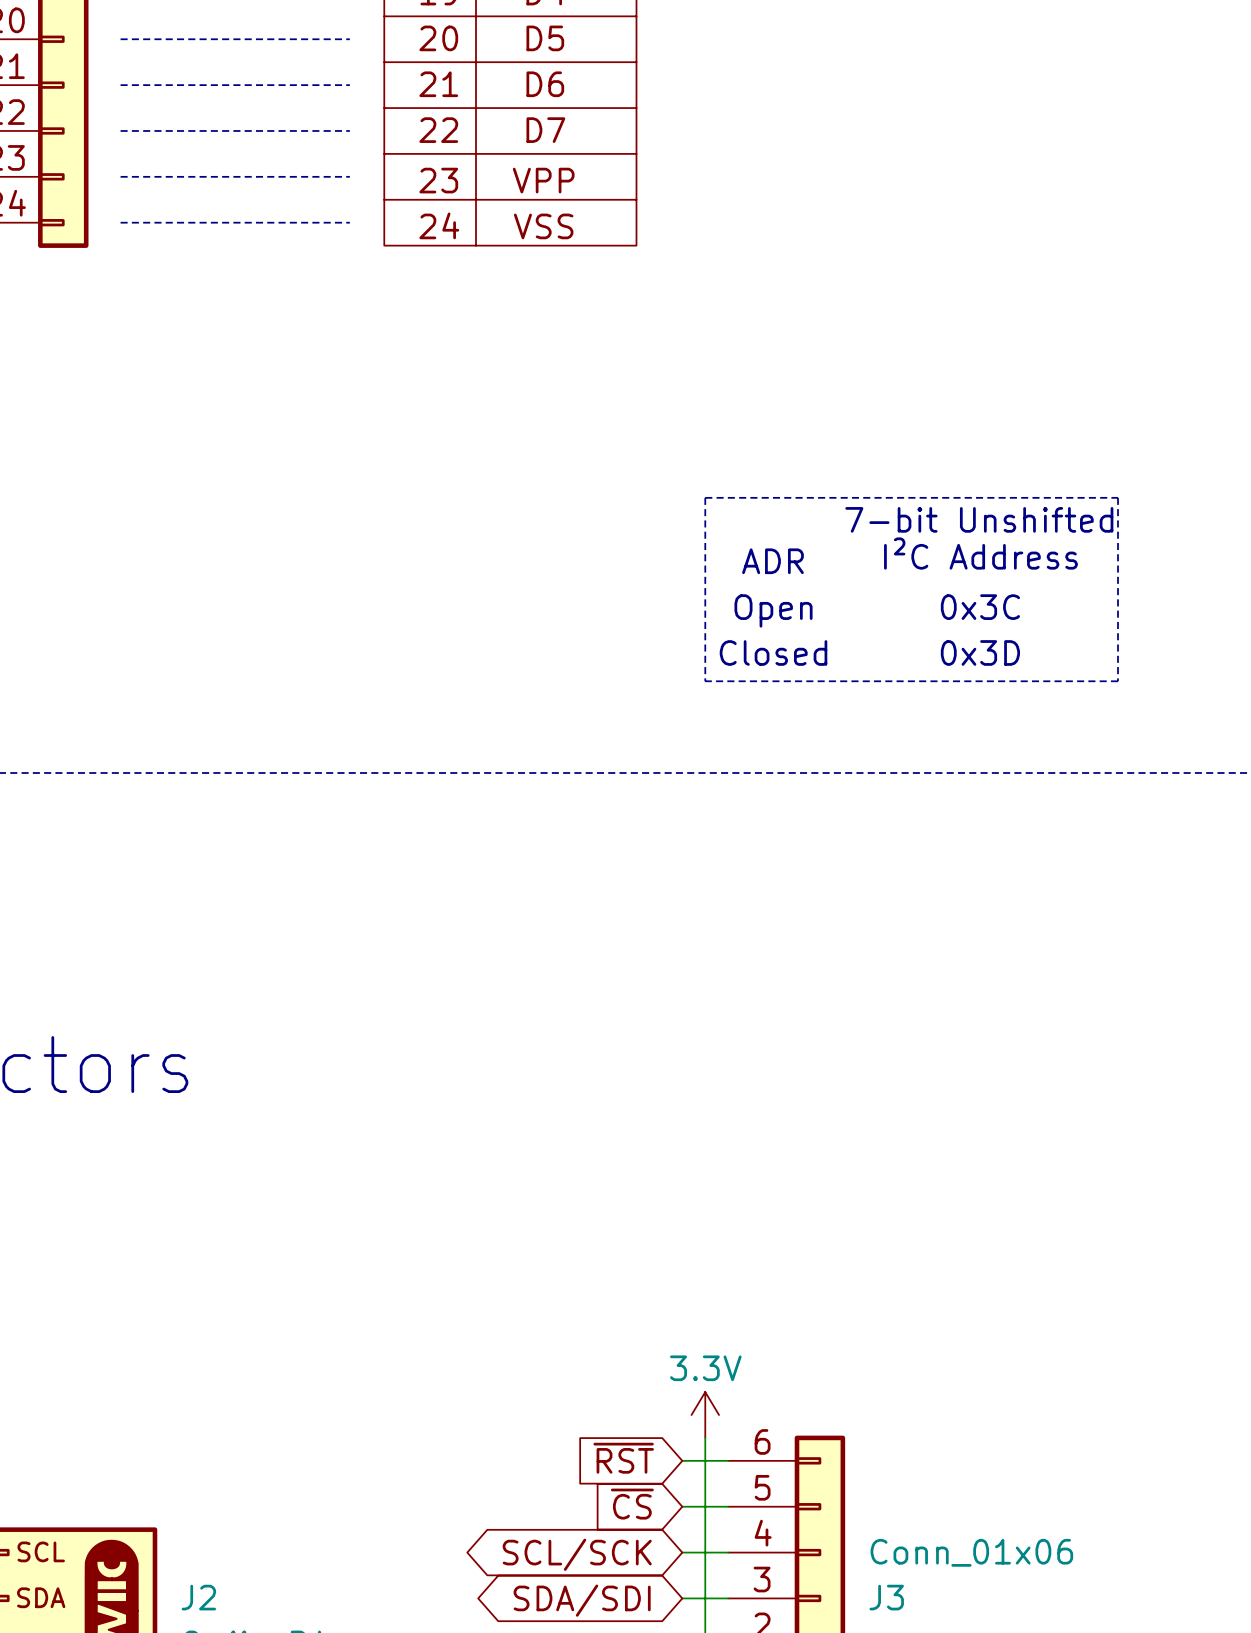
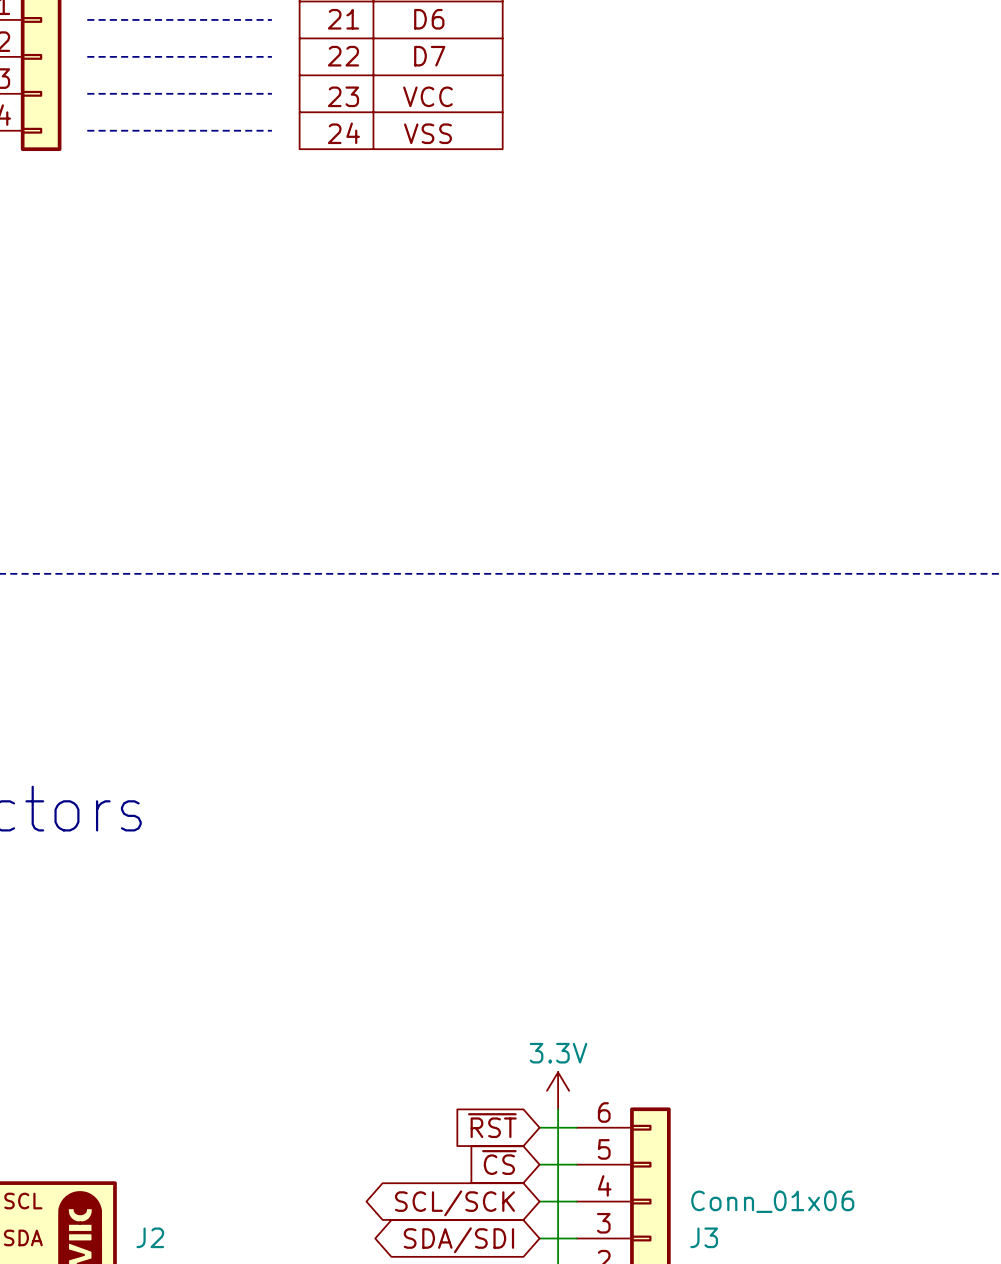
part text: VPP (543, 180) -> VCC (427, 96)
line: (705, 497) (705, 681) (1118, 681) (1118, 497) (705, 497) -> none
text: 7-bit Unshifted (979, 519) -> none
text: I²C Address (980, 553) -> none
text: ADR (772, 561) -> none
text: 0x3C (980, 607) -> none
text: Open (773, 610) -> none
text: Closed (773, 652) -> none
text: 0x3D (980, 652) -> none

